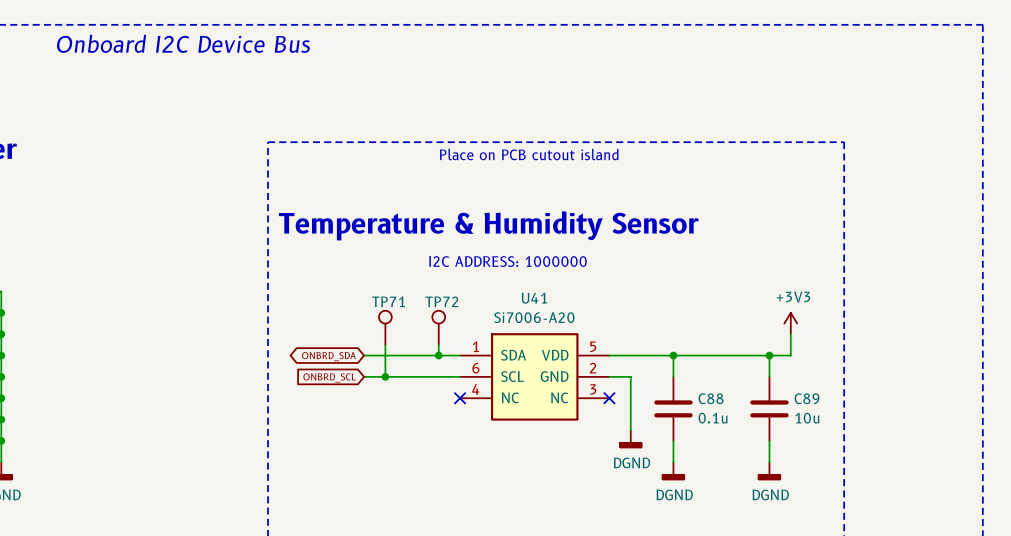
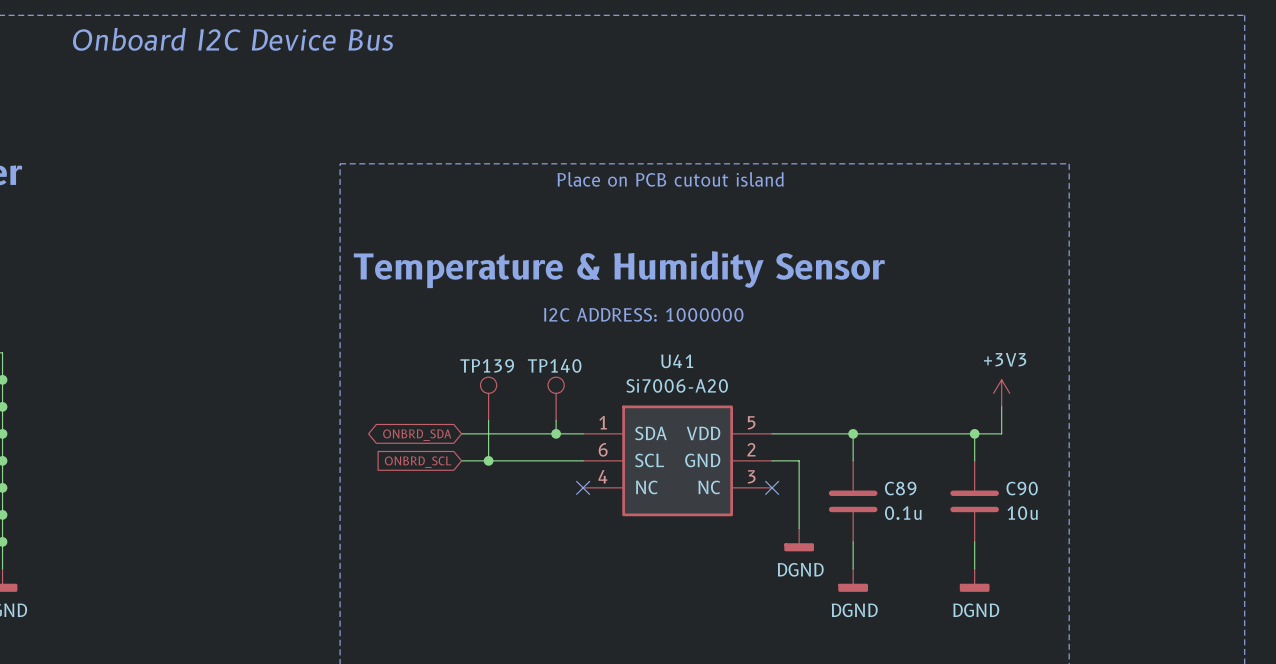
TP71 name: TP71 (388, 301) -> TP139 (487, 365)
TP72 name: TP72 (441, 301) -> TP140 (554, 365)
C88 name: C88 (711, 398) -> C89 (900, 488)
C89 name: C89 (807, 398) -> C90 (1022, 488)

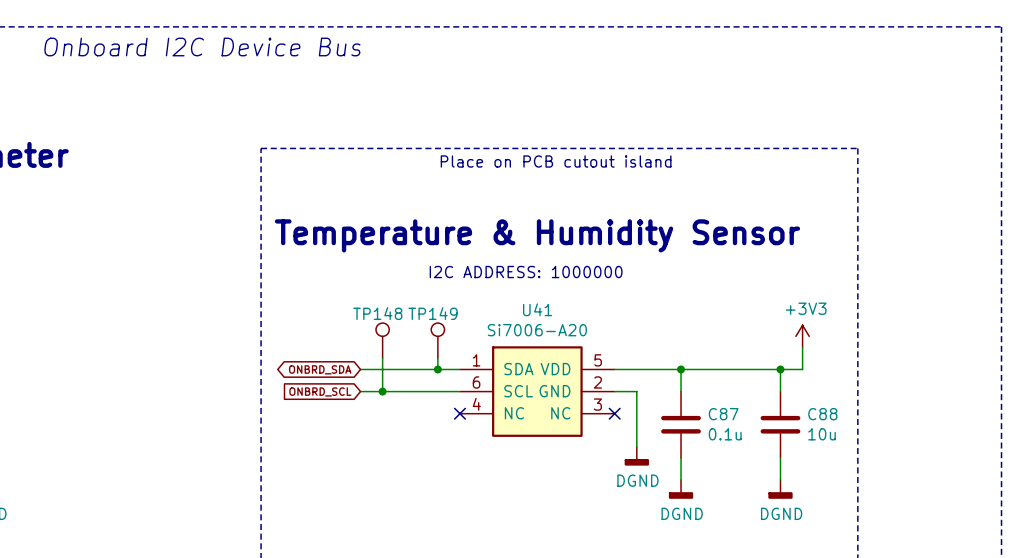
TP139 name: TP139 (487, 365) -> TP148 (377, 313)
TP140 name: TP140 (554, 365) -> TP149 (433, 313)
C89 name: C89 (900, 488) -> C87 (723, 414)
C90 name: C90 (1022, 488) -> C88 (822, 414)

